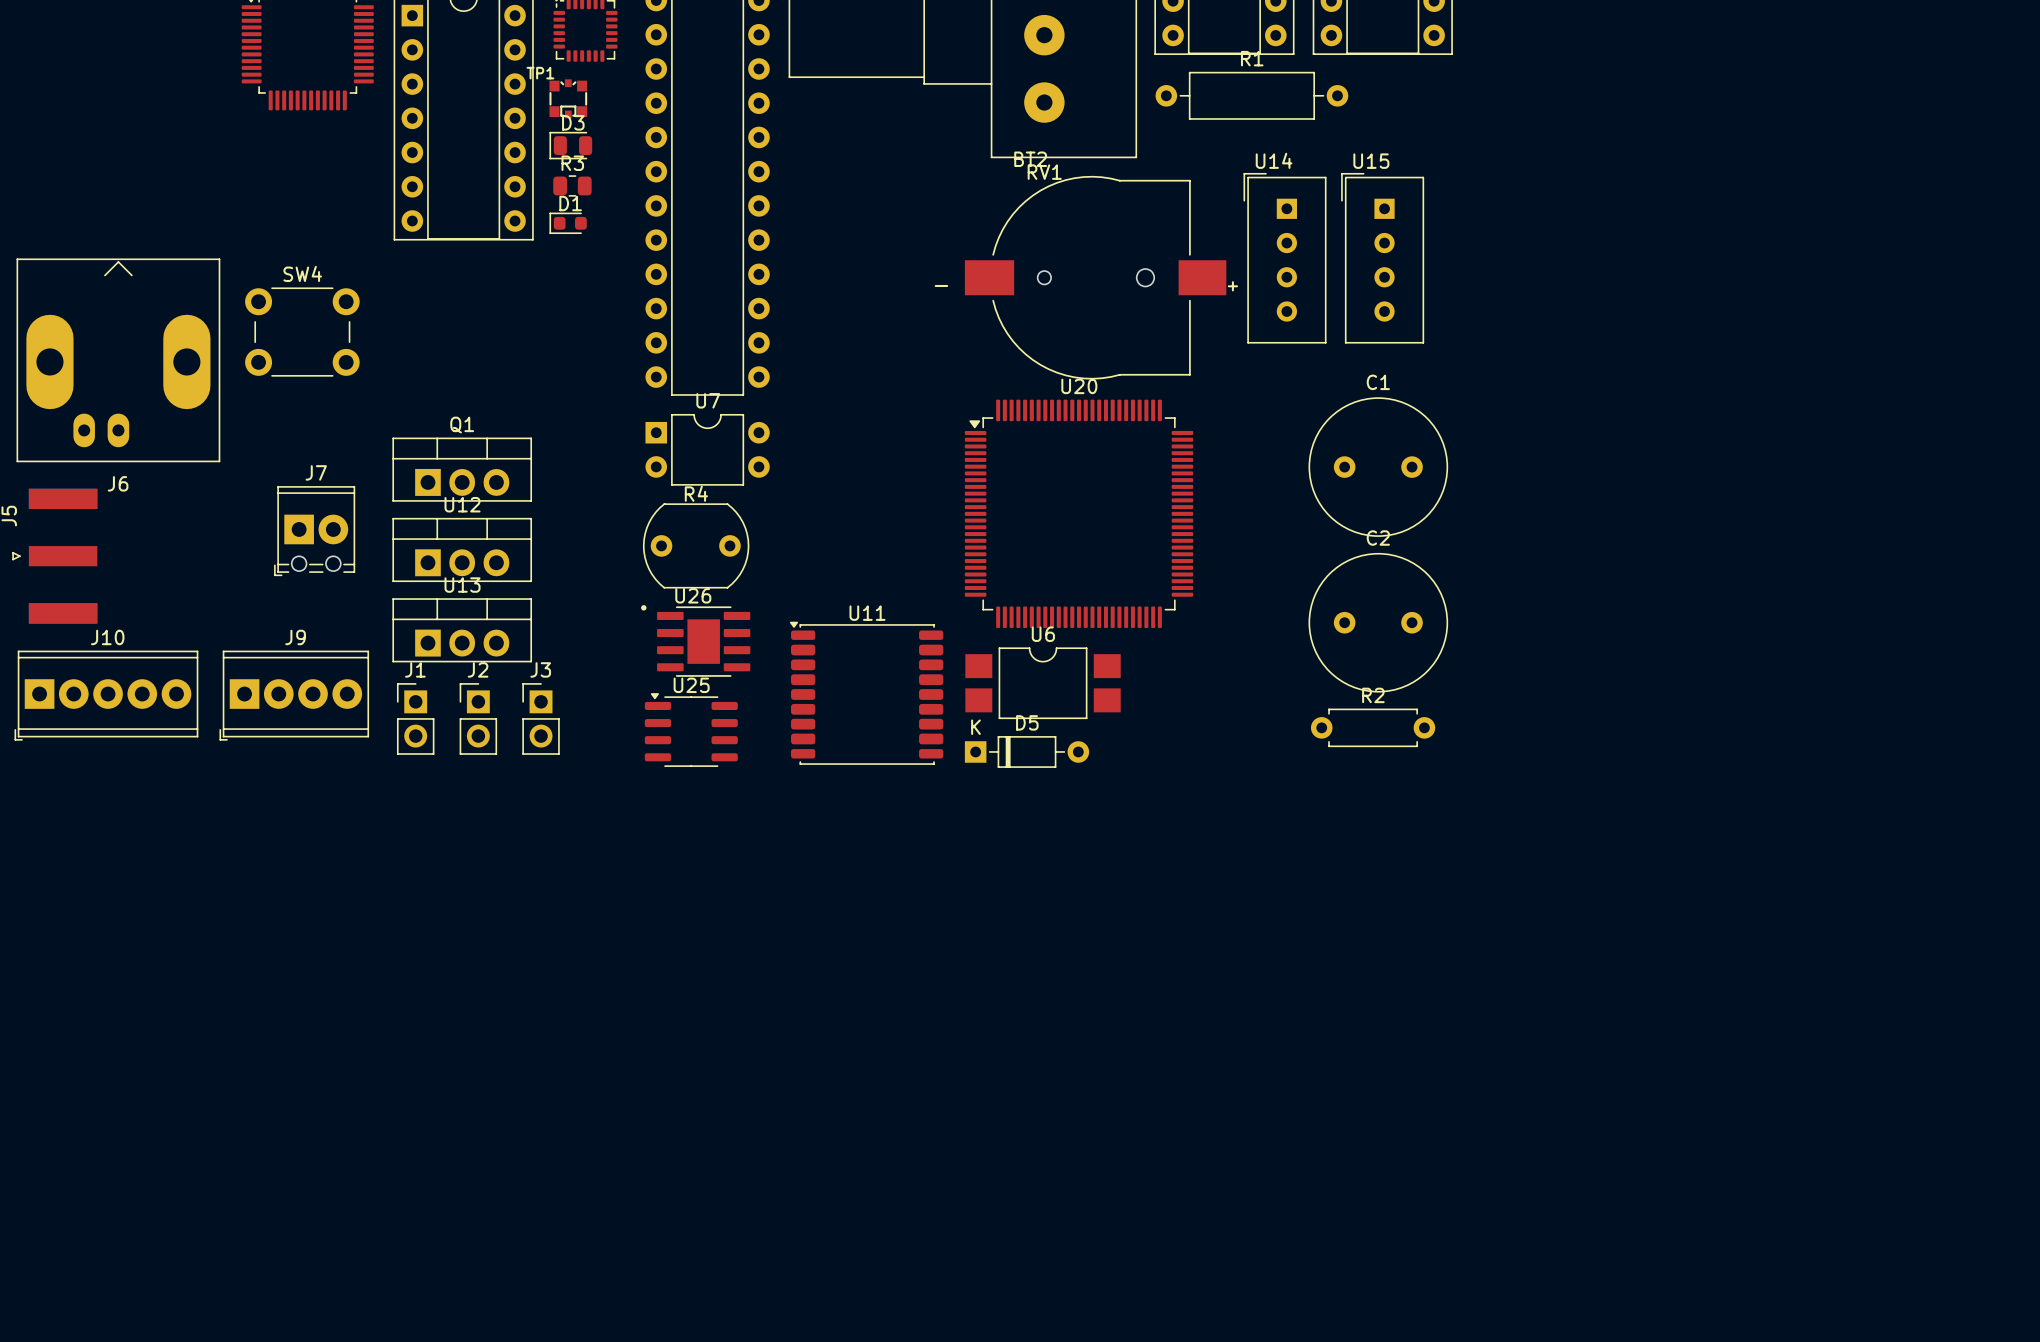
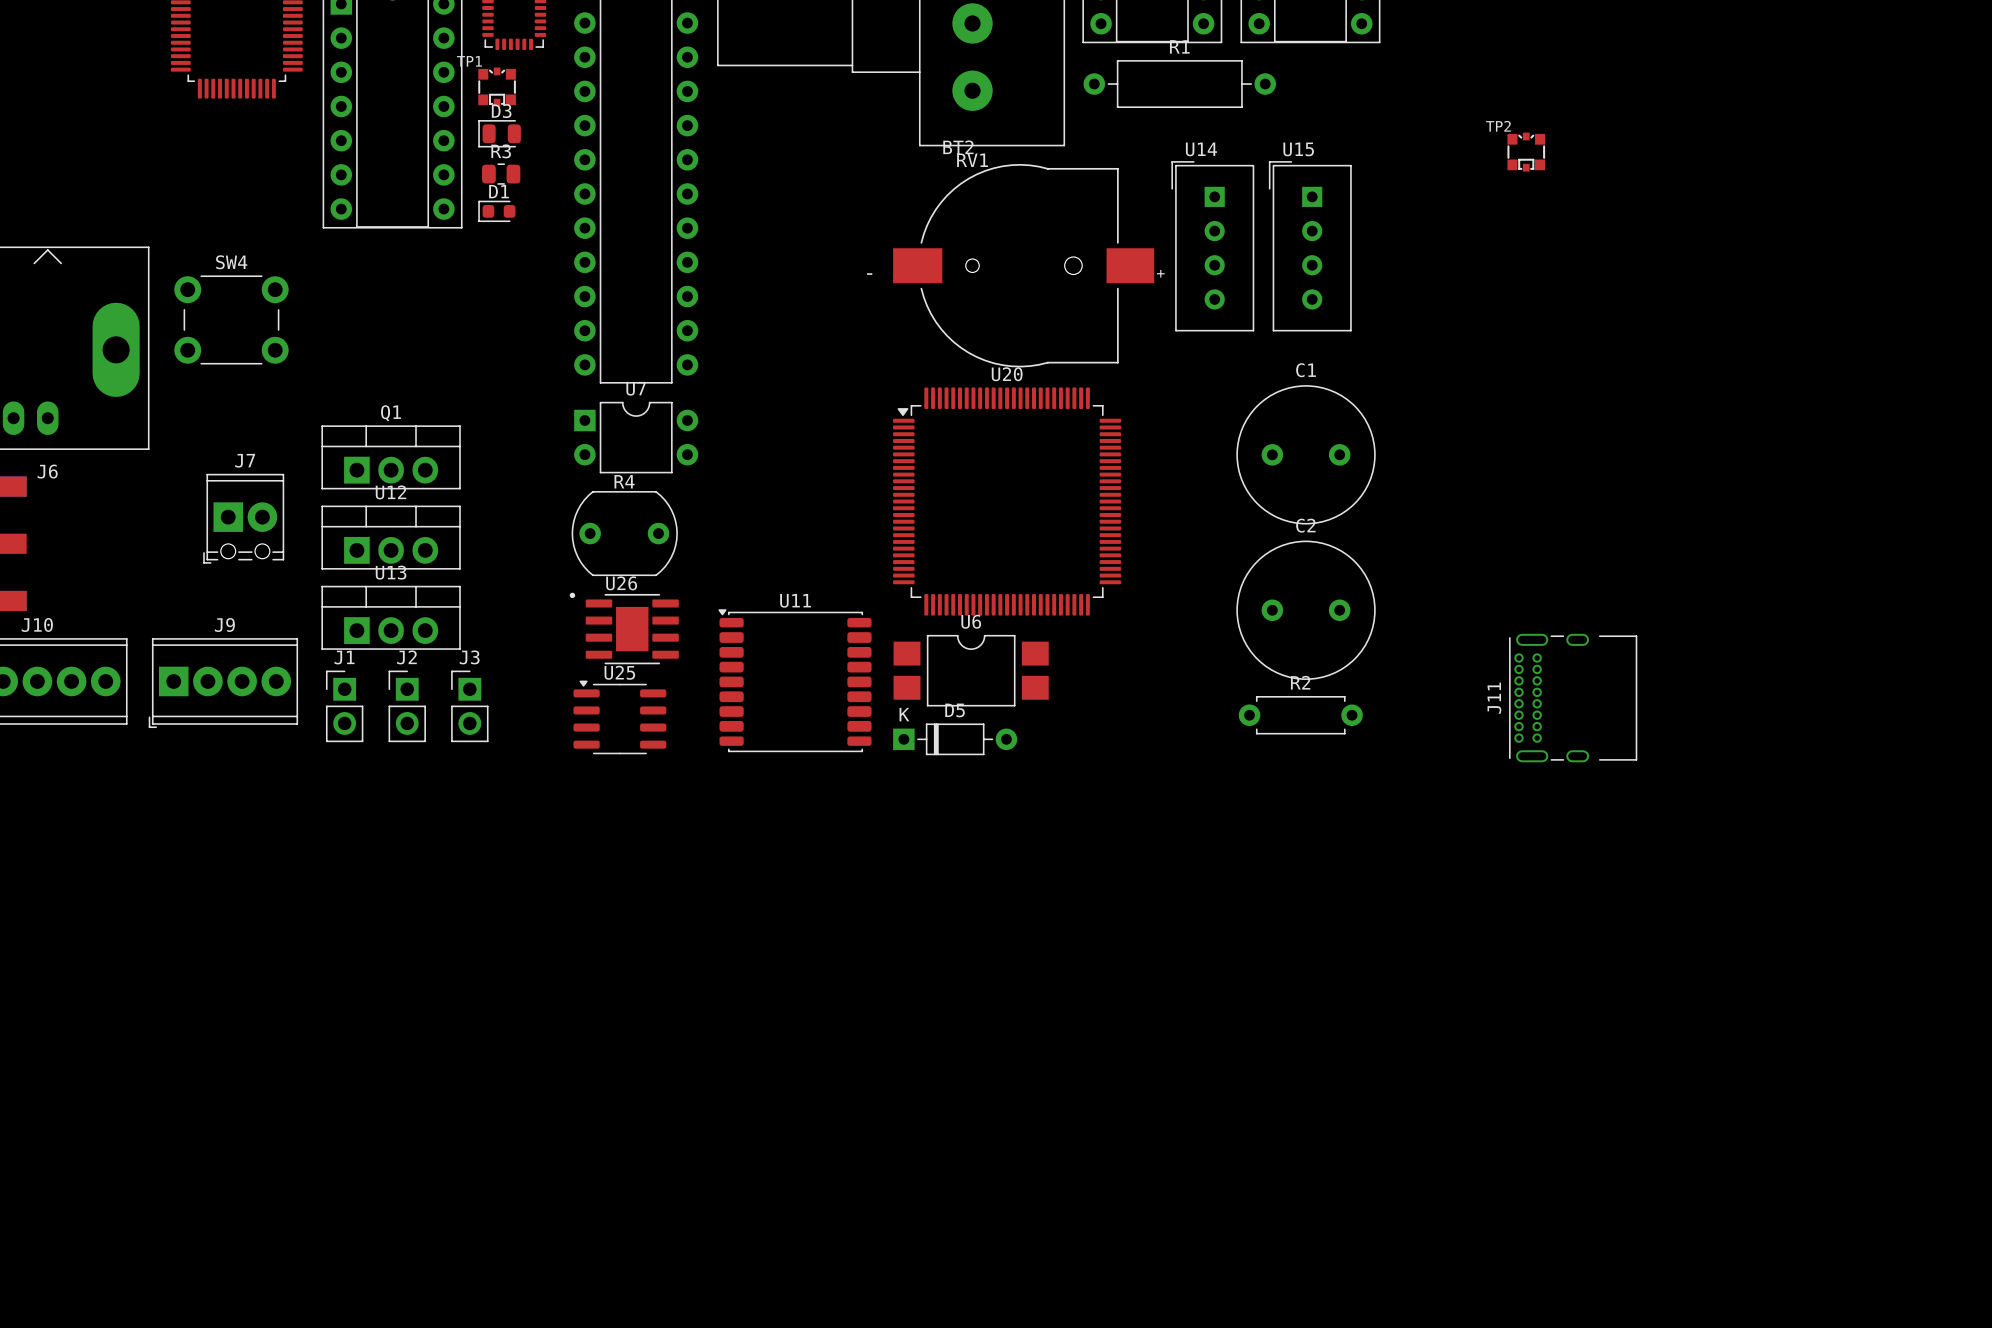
TP2: none -> (1526, 152)
J11: none -> (1573, 698)

